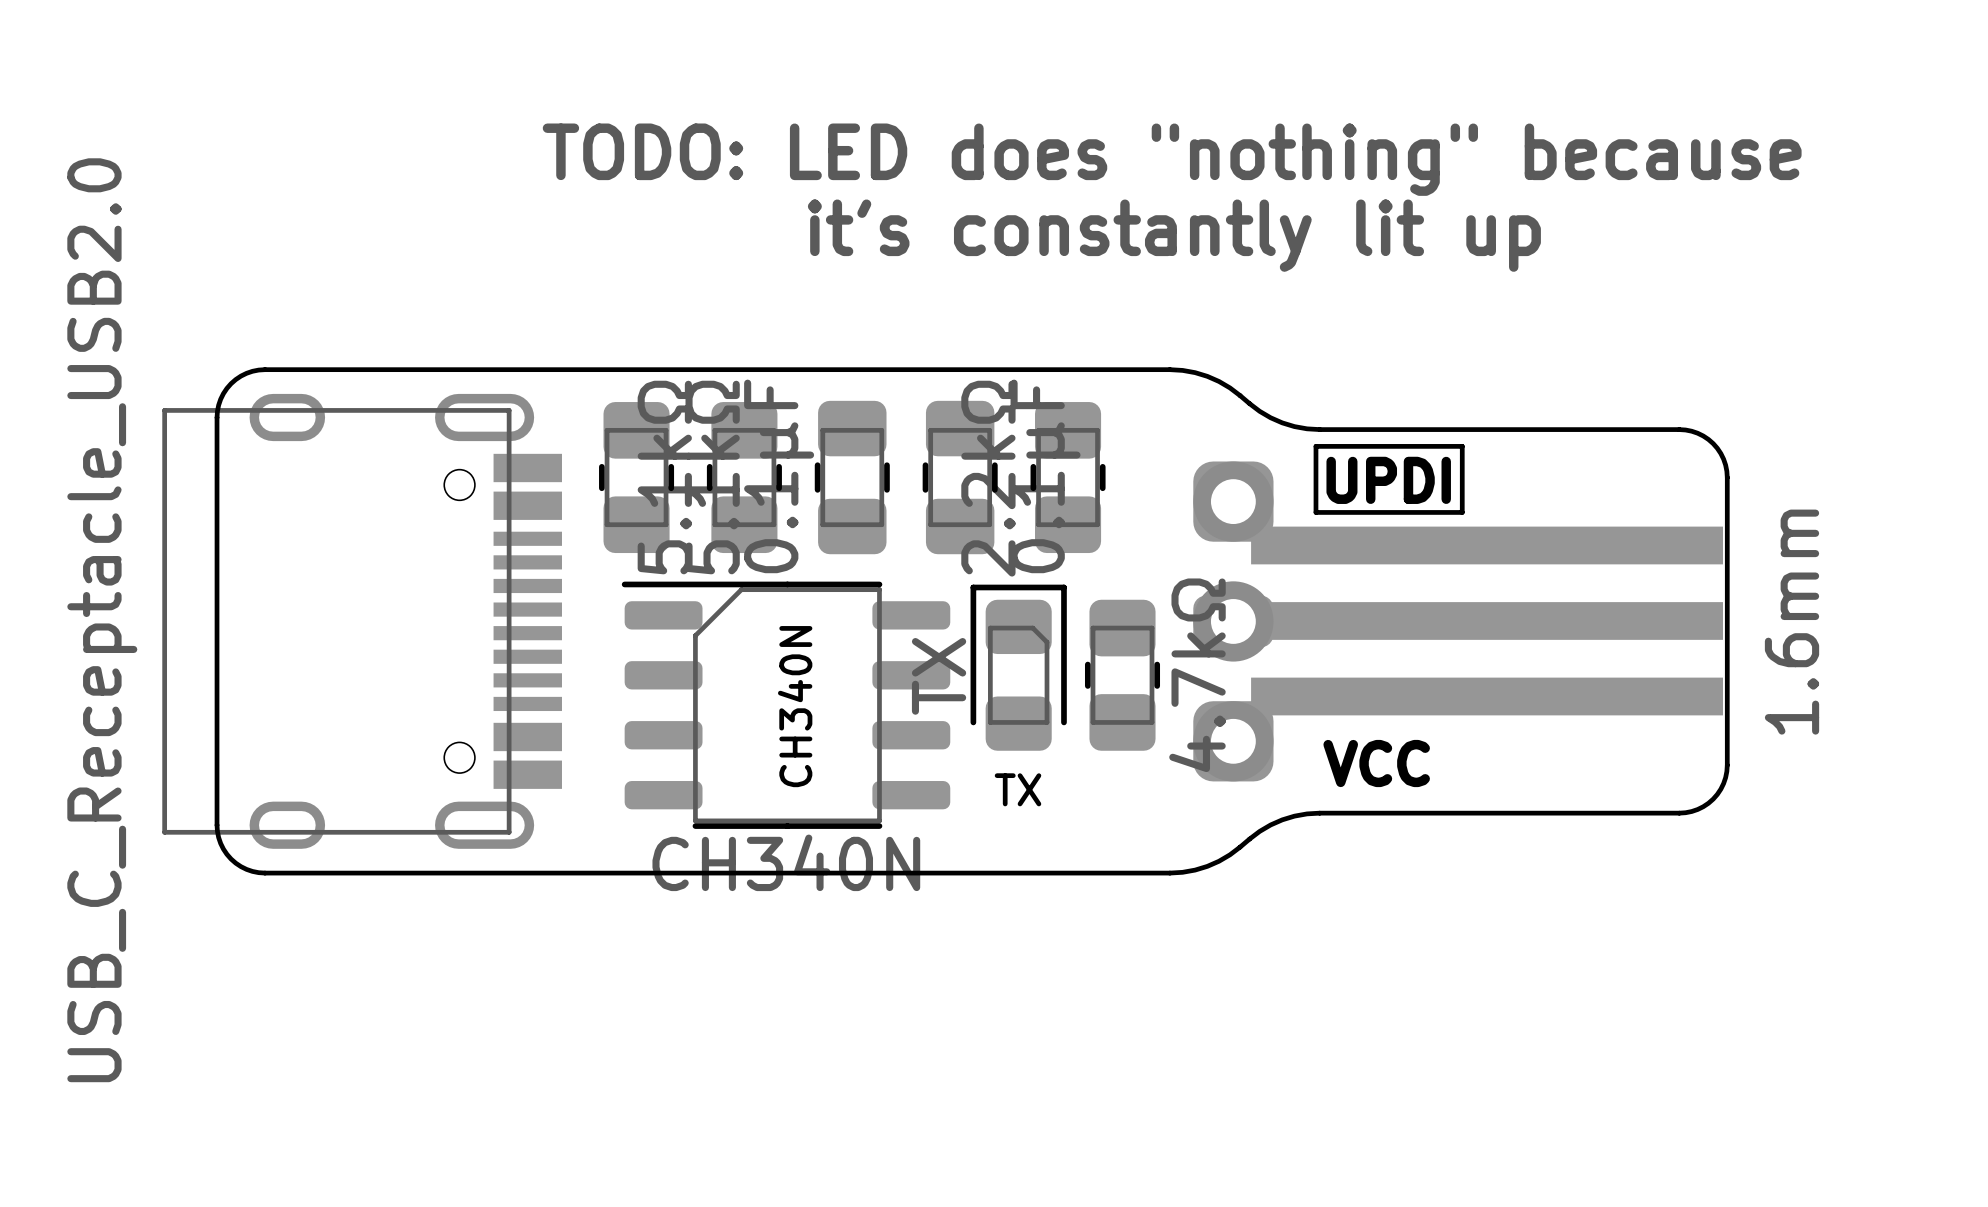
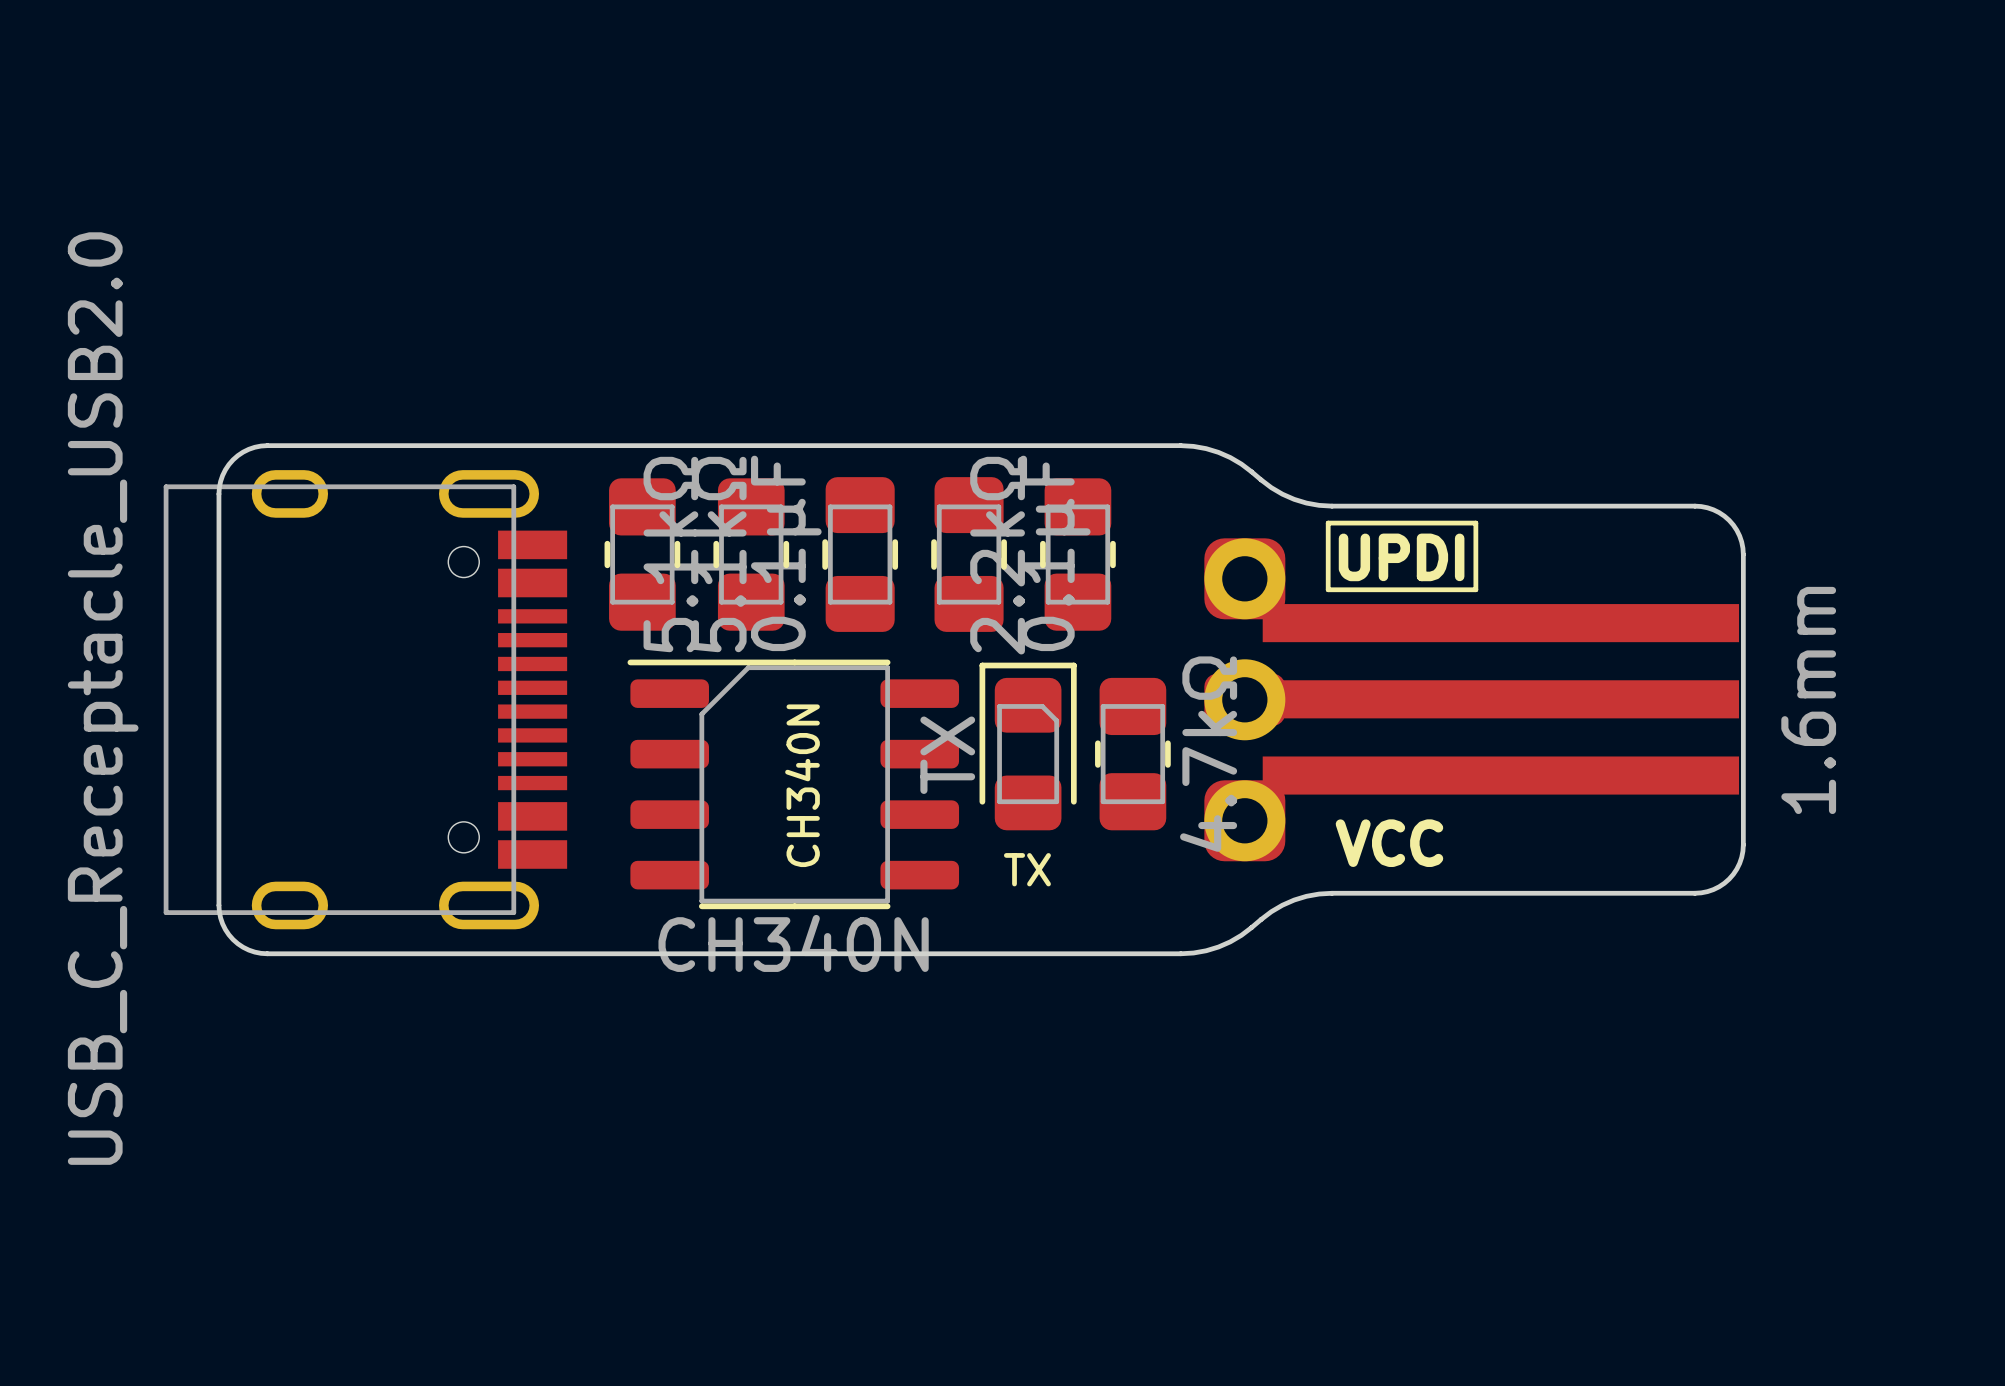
text: TODO: LED does "nothing" because (1172, 159) -> none
text: it's constantly lit up (1174, 235) -> none

